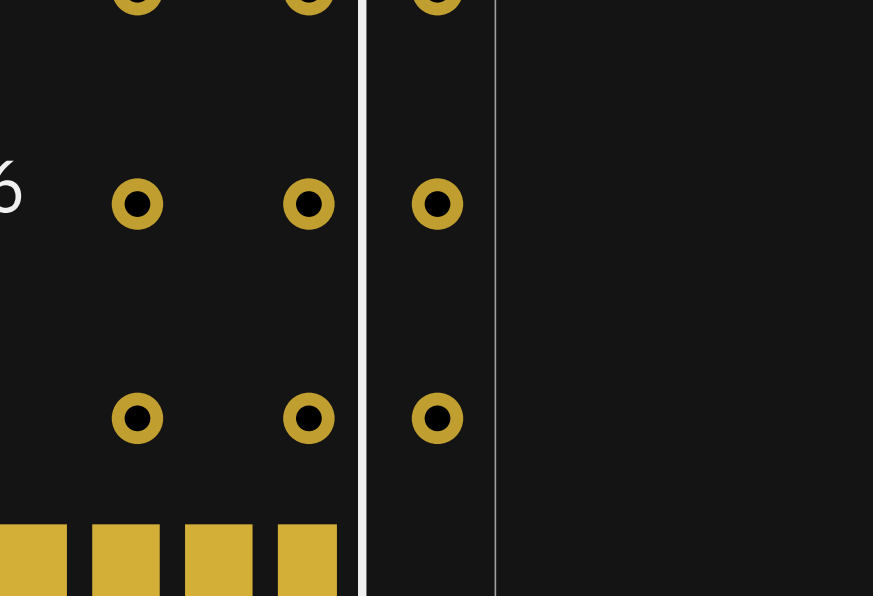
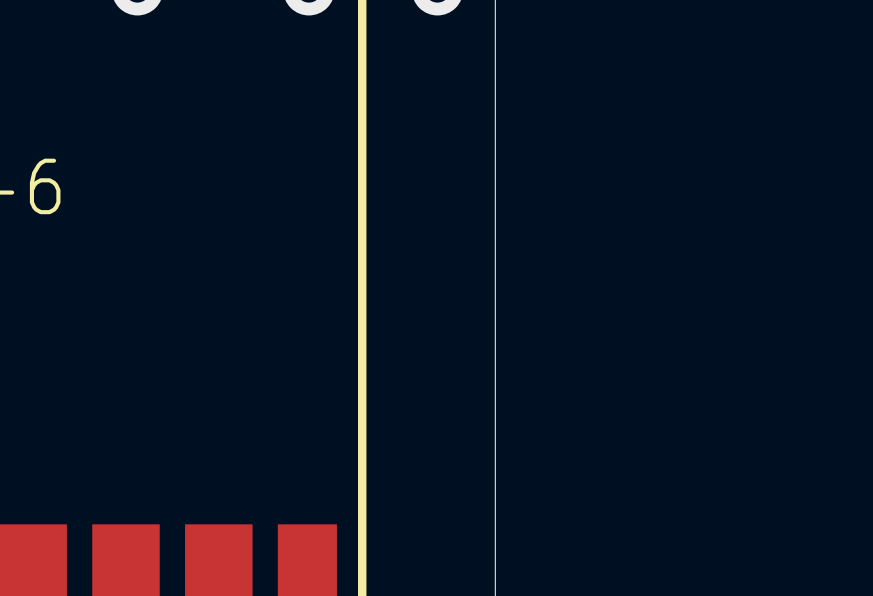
via: (137, 204) -> none
via: (308, 204) -> none
via: (437, 204) -> none
via: (137, 418) -> none
via: (308, 418) -> none
via: (437, 418) -> none

